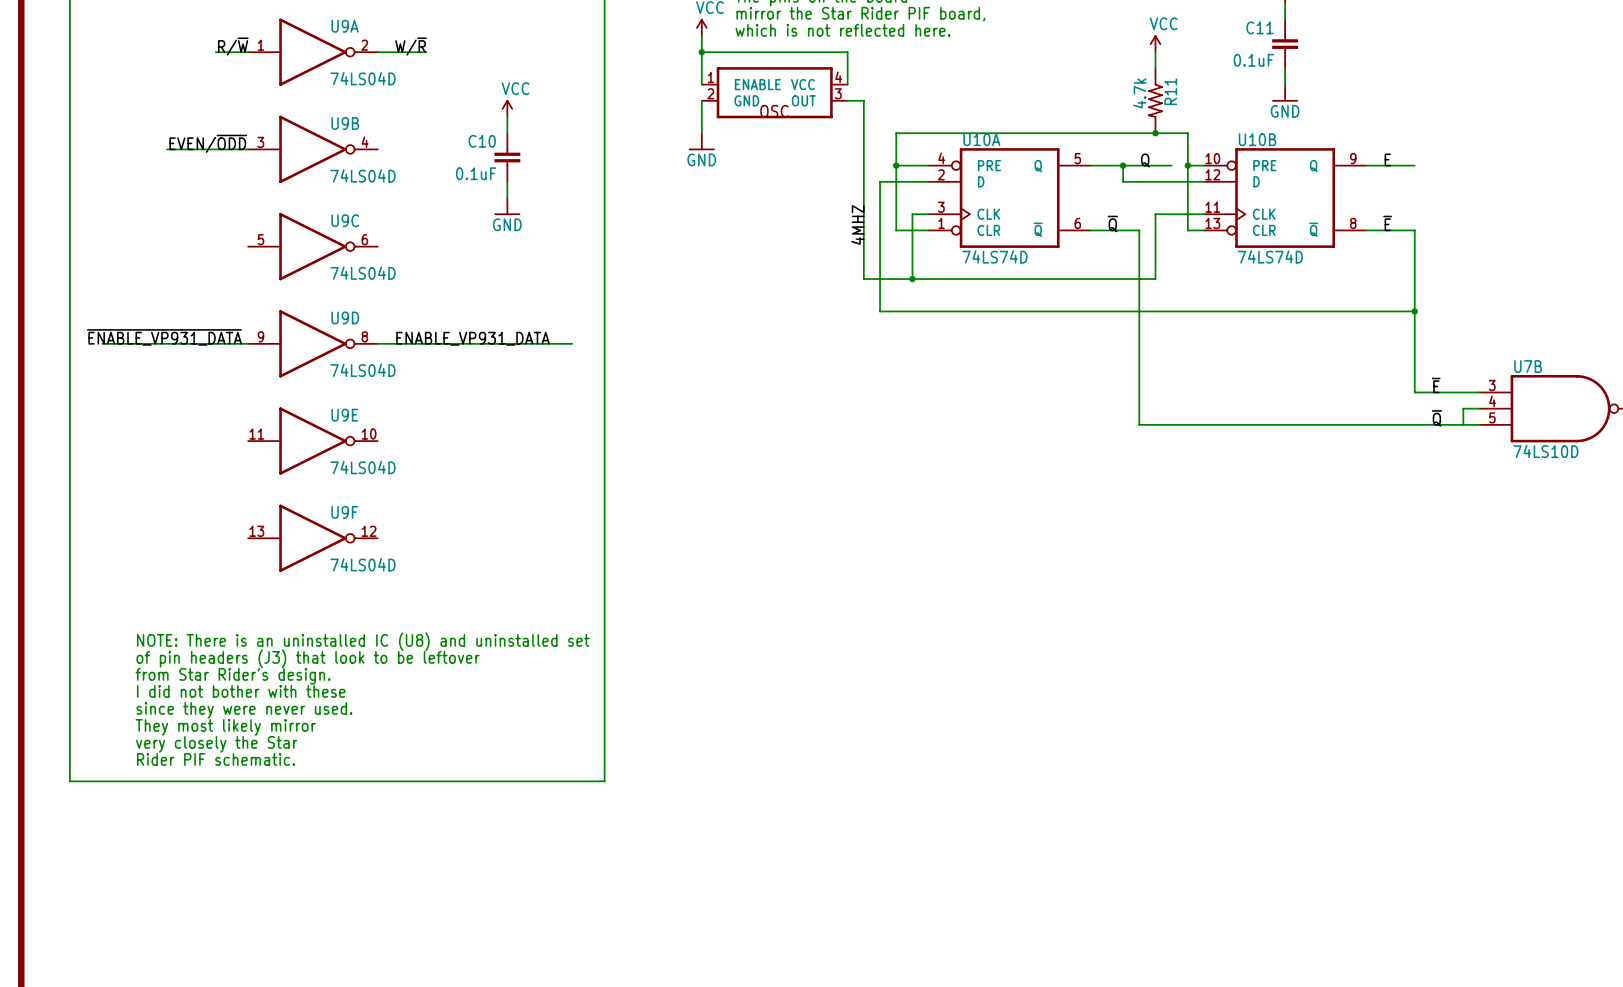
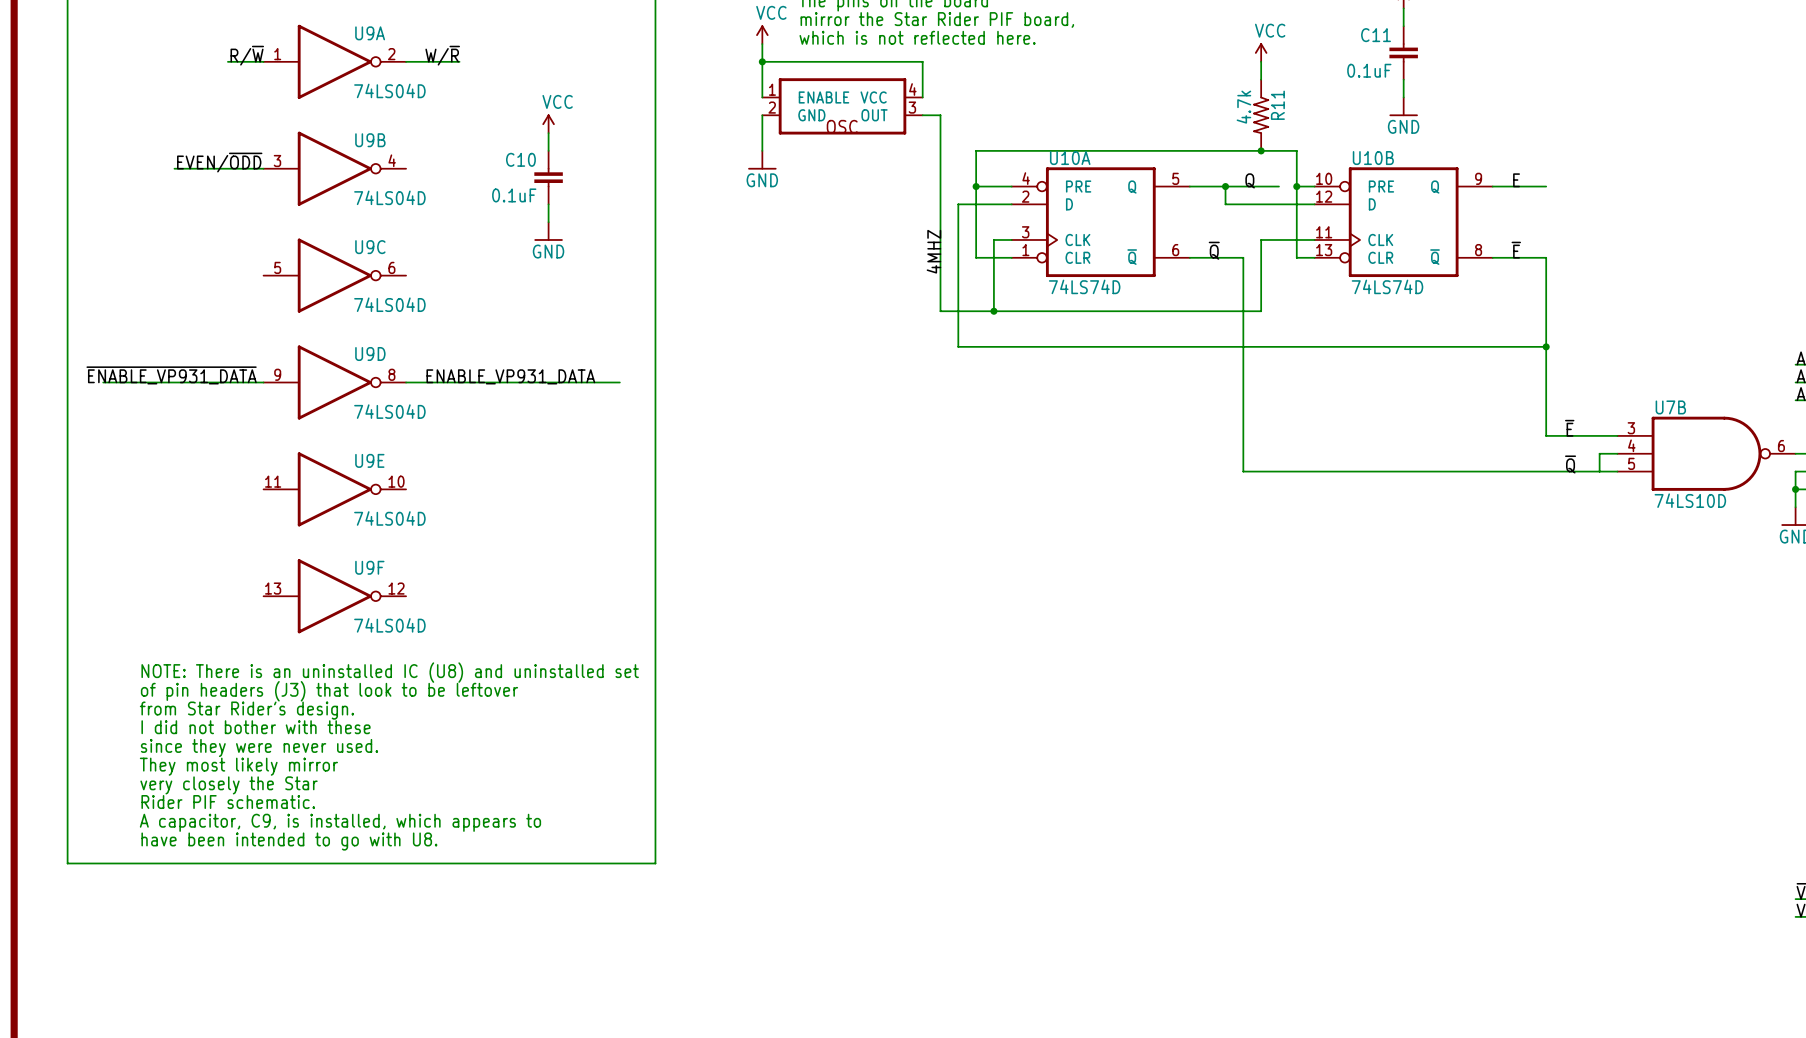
text: none -> NOTE: There is an uninstalled IC (U8) and uninstalled set (390, 672)
text: none -> of pin headers (J3) that look to be leftover (329, 691)
text: NOTE: There is an uninstalled IC (U8) and uninstalled set (363, 641) -> from Star Rider's design. (246, 710)
text: of pin headers (J3) that look to be leftover (308, 658) -> I did not bother with these (256, 727)
text: from Star Rider's design. (233, 676) -> since they were never used. (259, 747)
text: I did not bother with these (241, 691) -> They most likely mirror (238, 766)
text: since they were never used. (244, 710) -> very closely the Star (229, 785)
text: They most likely mirror (225, 727) -> Rider PIF schematic. (228, 802)
text: very closely the Star (216, 744) -> A capacitor, C9, is installed, which appears to (340, 822)
text: Rider PIF schematic. (215, 759) -> have been intended to go with U8. (289, 841)

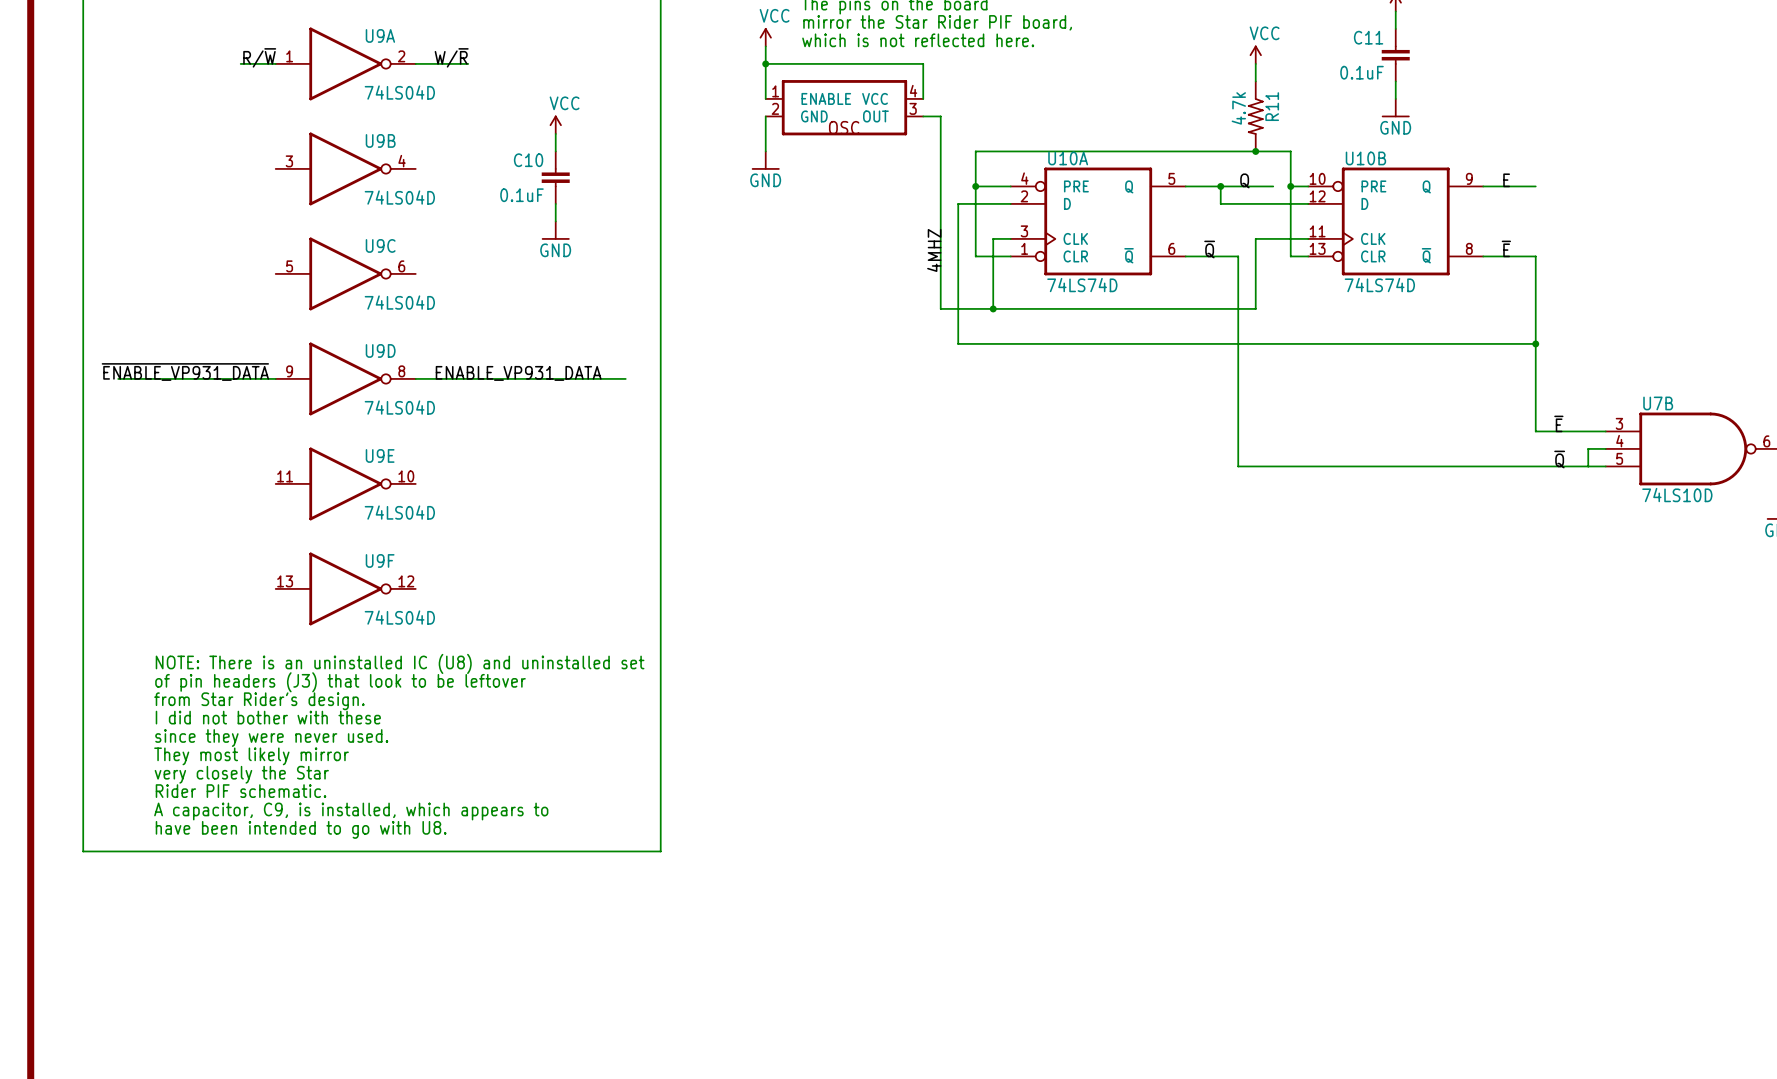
label: EVEN/~{ODD} (219, 162) -> none
wire: (174, 168) (263, 168) -> none

